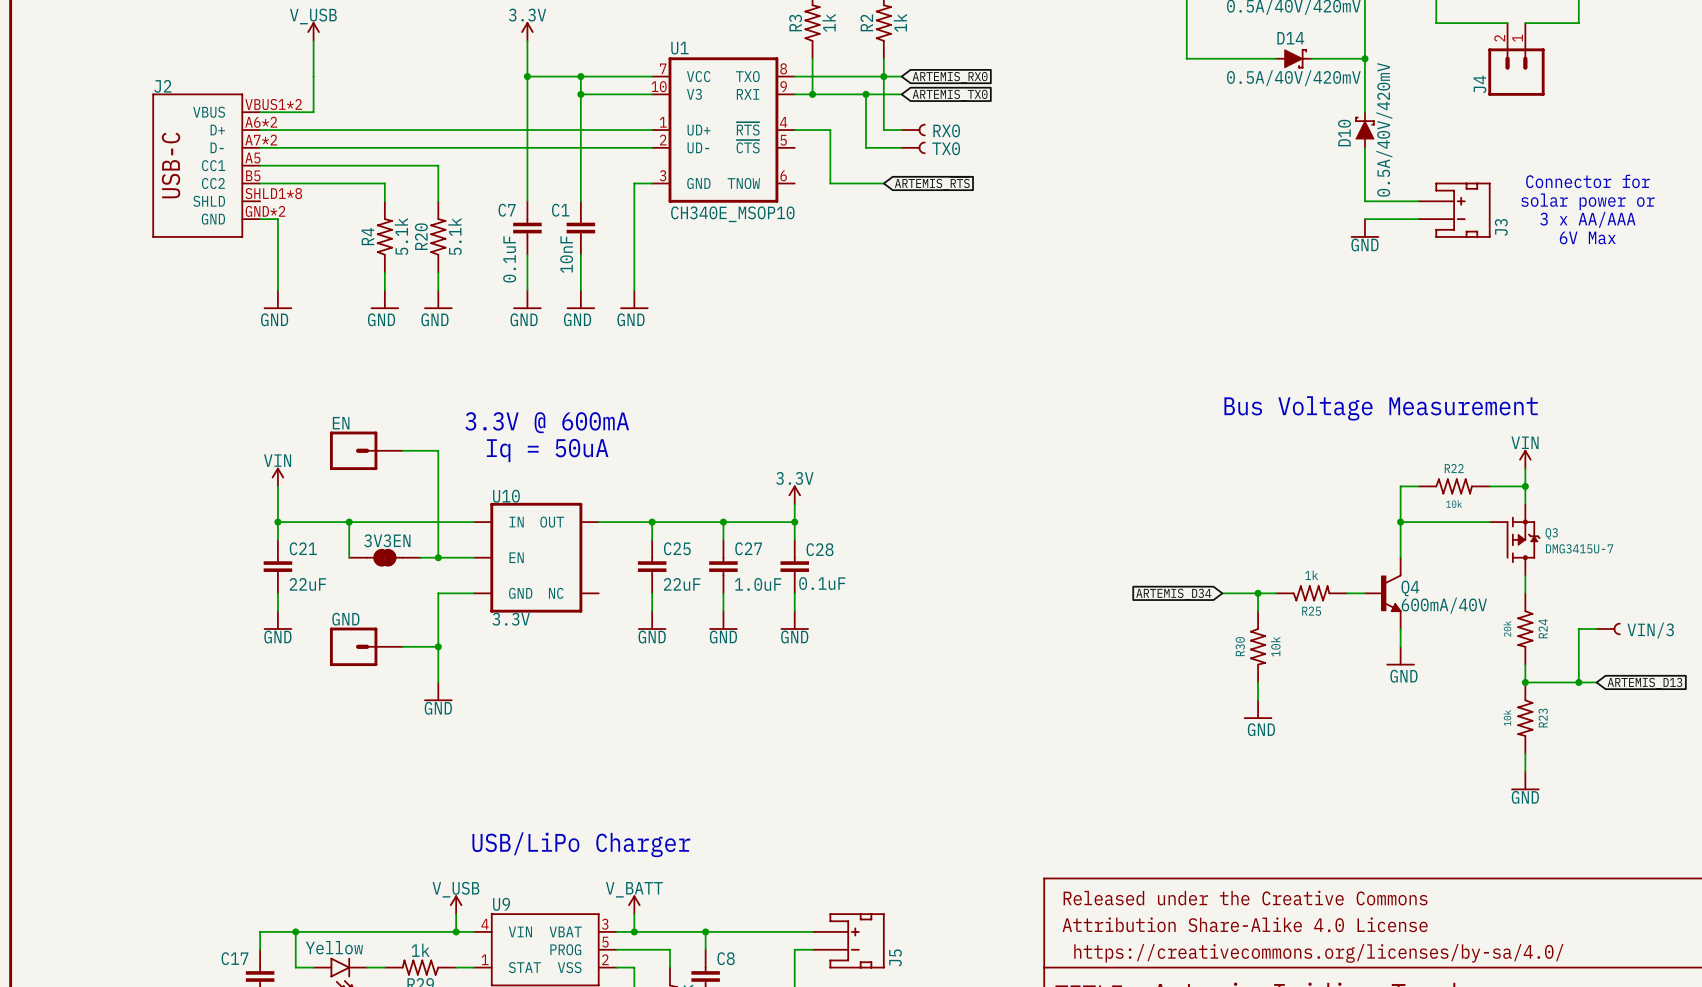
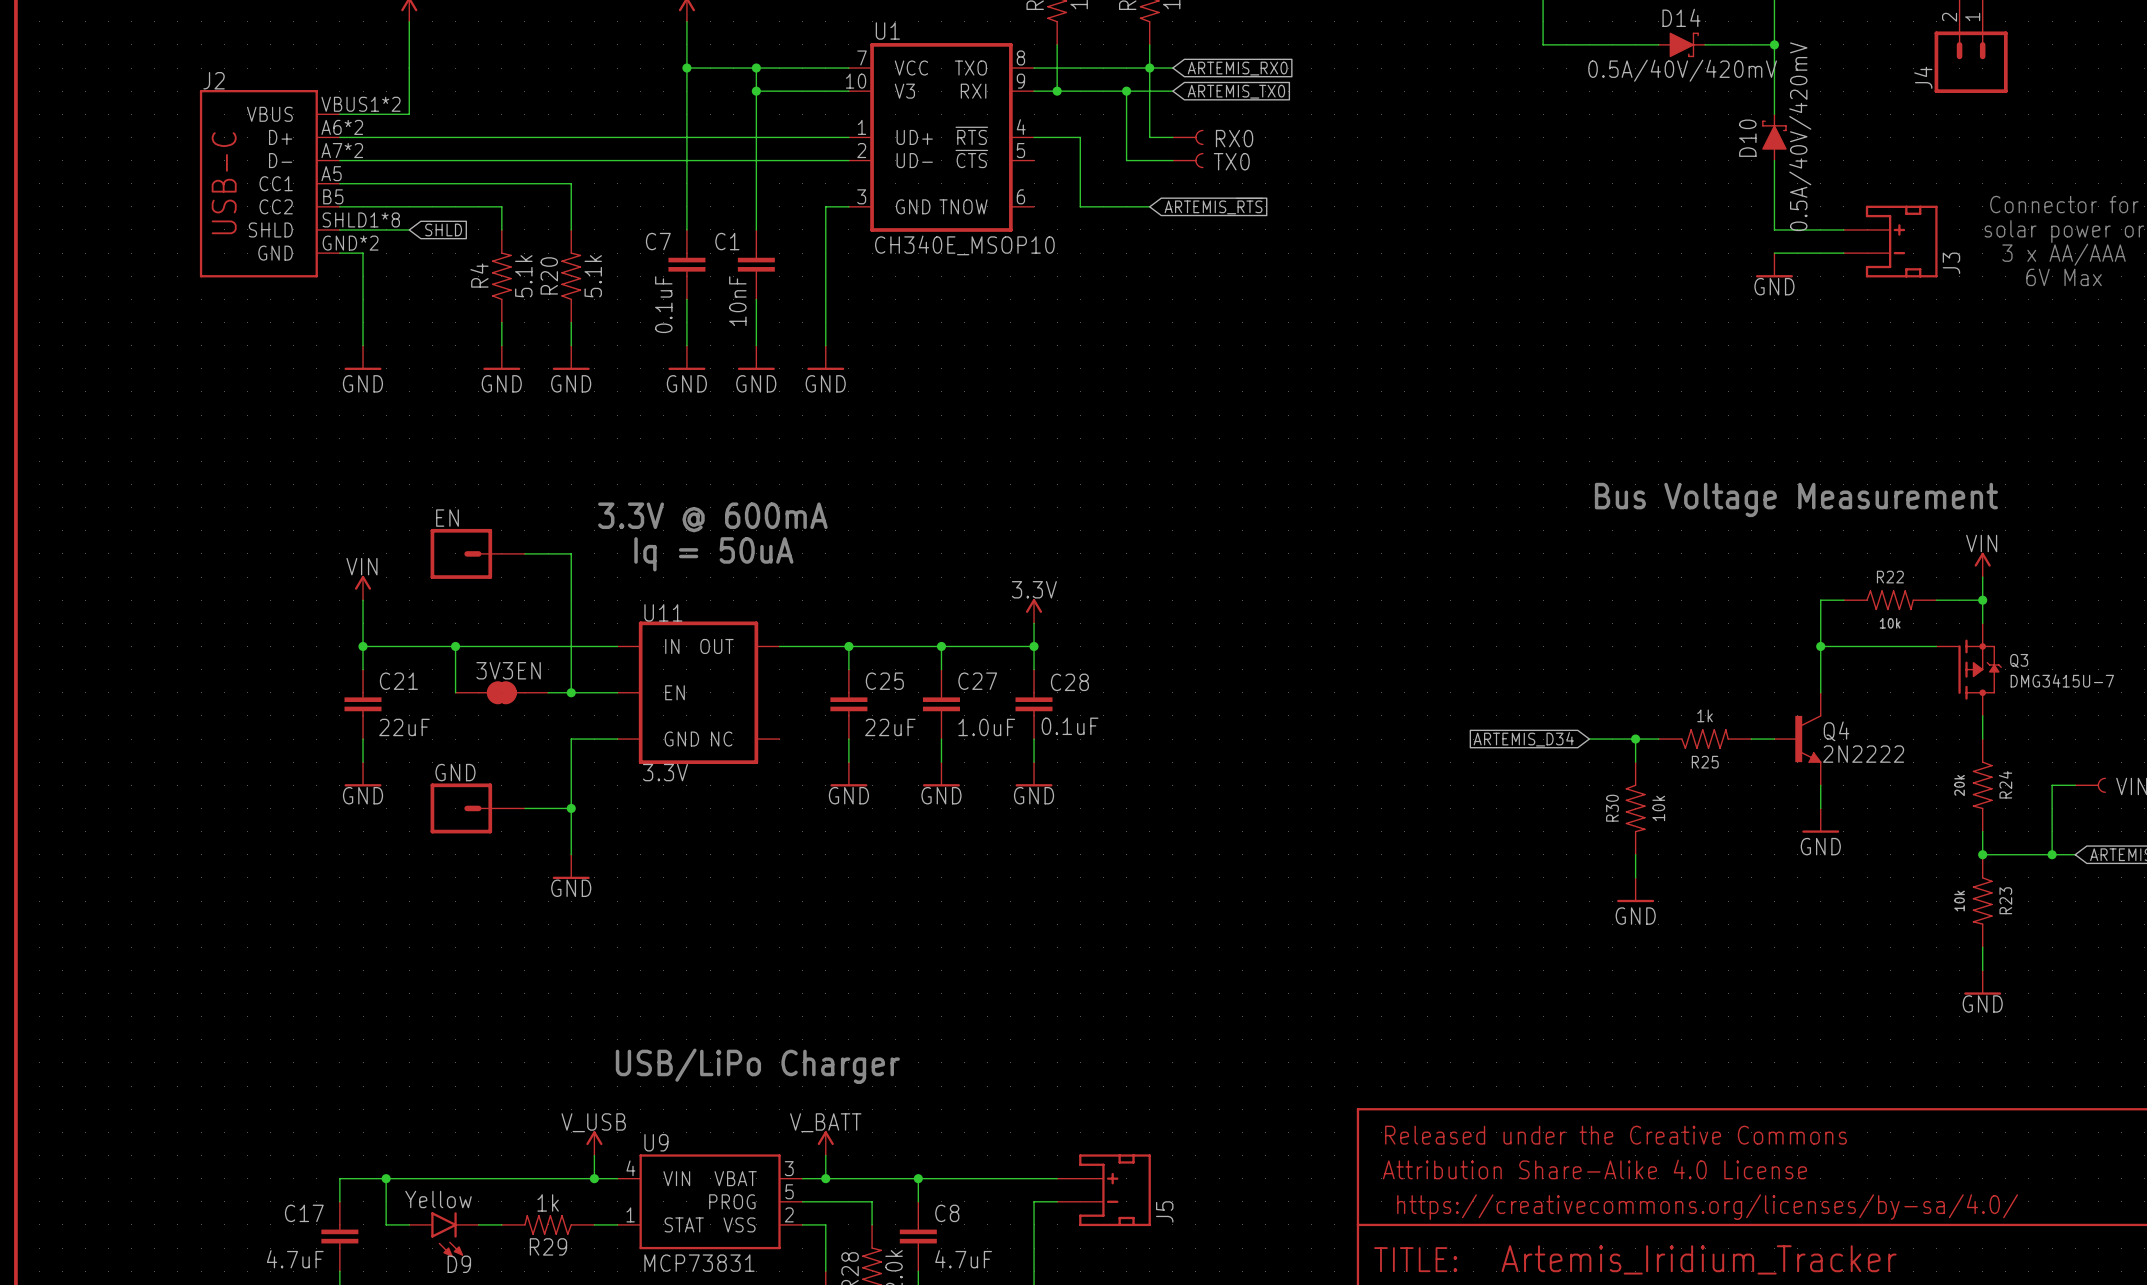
wire: none -> (339, 229) (409, 229)
global label: none -> SHLD (443, 229)
U10 name: U10 (506, 496) -> U11 (663, 612)
Q4 value: 600mA/40V (1444, 605) -> 2N2222 (1863, 754)

